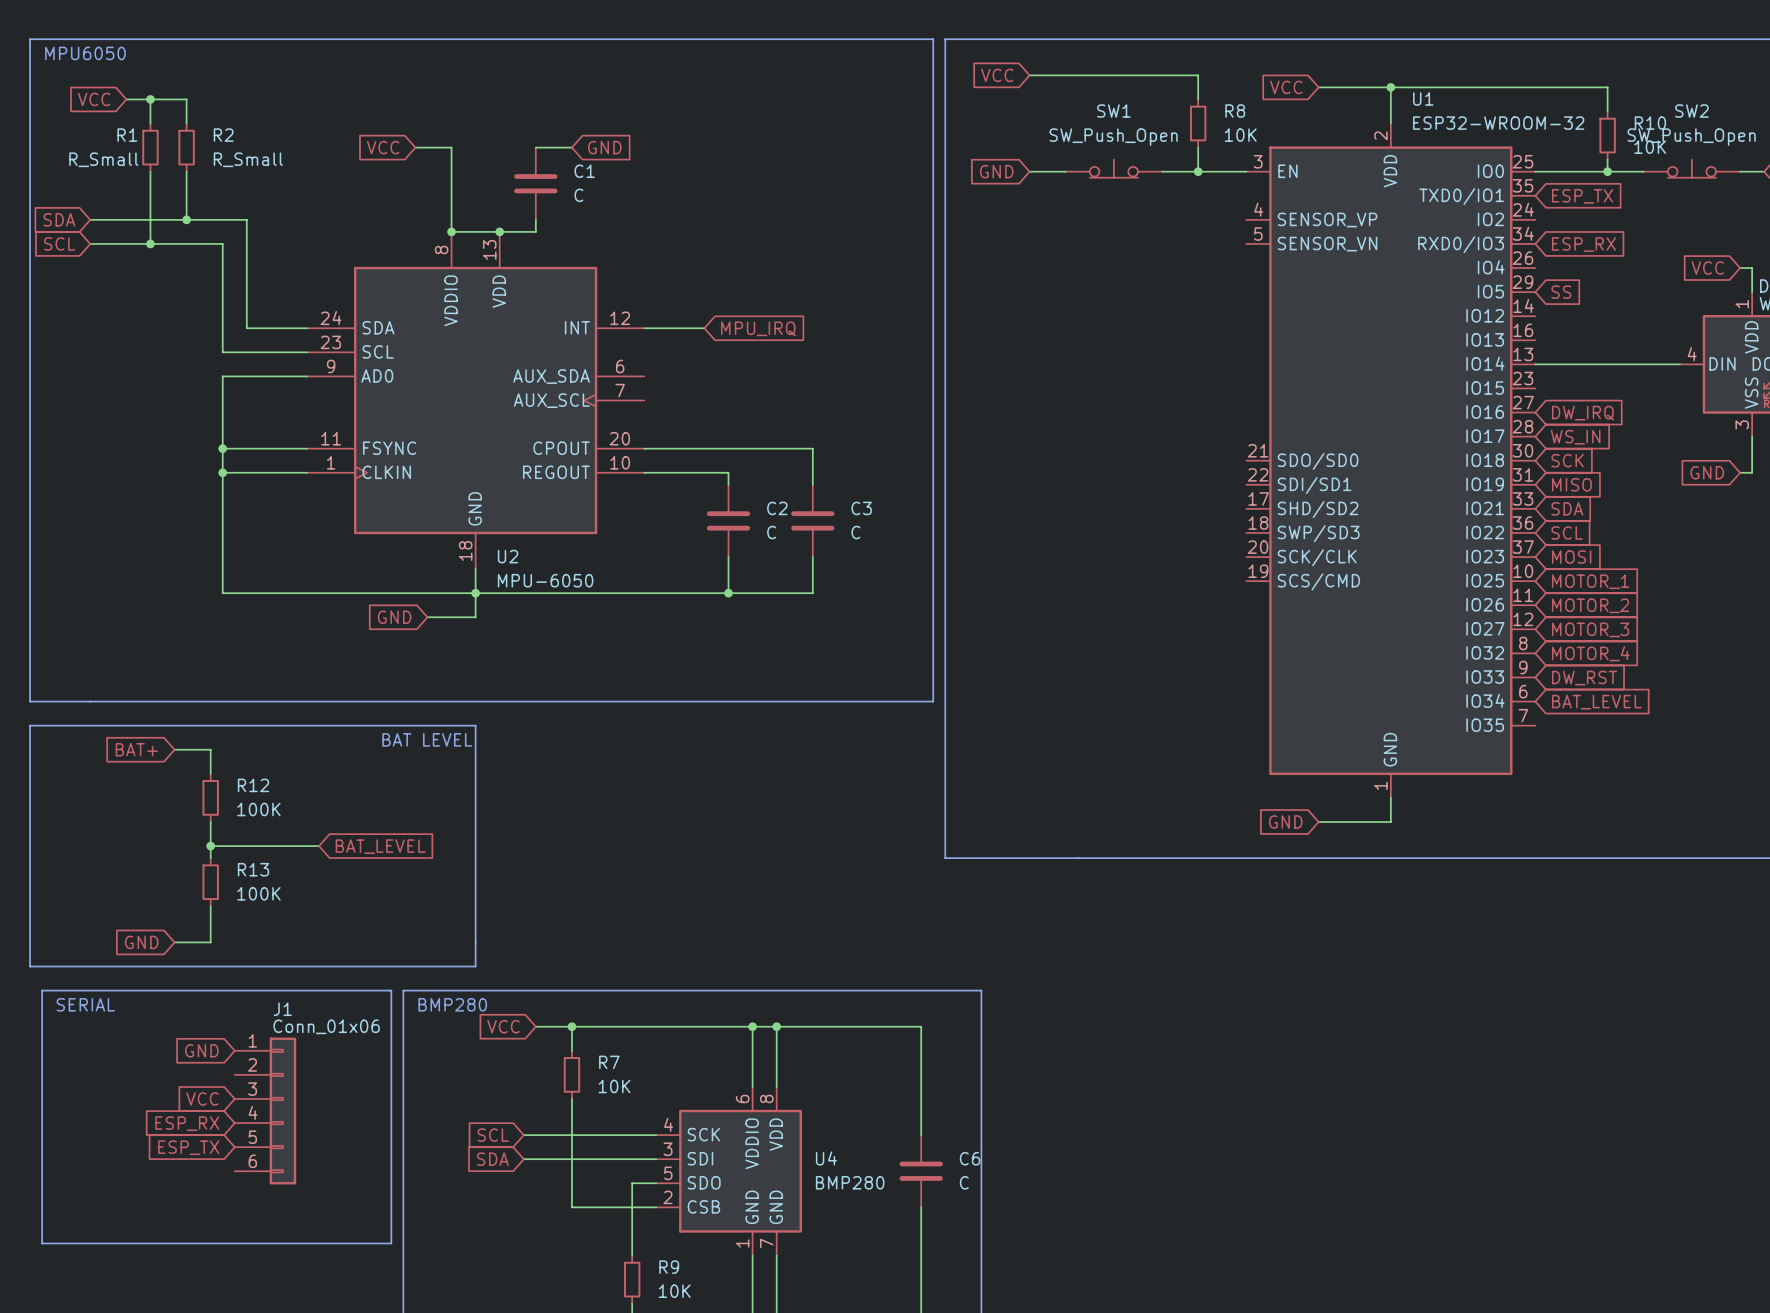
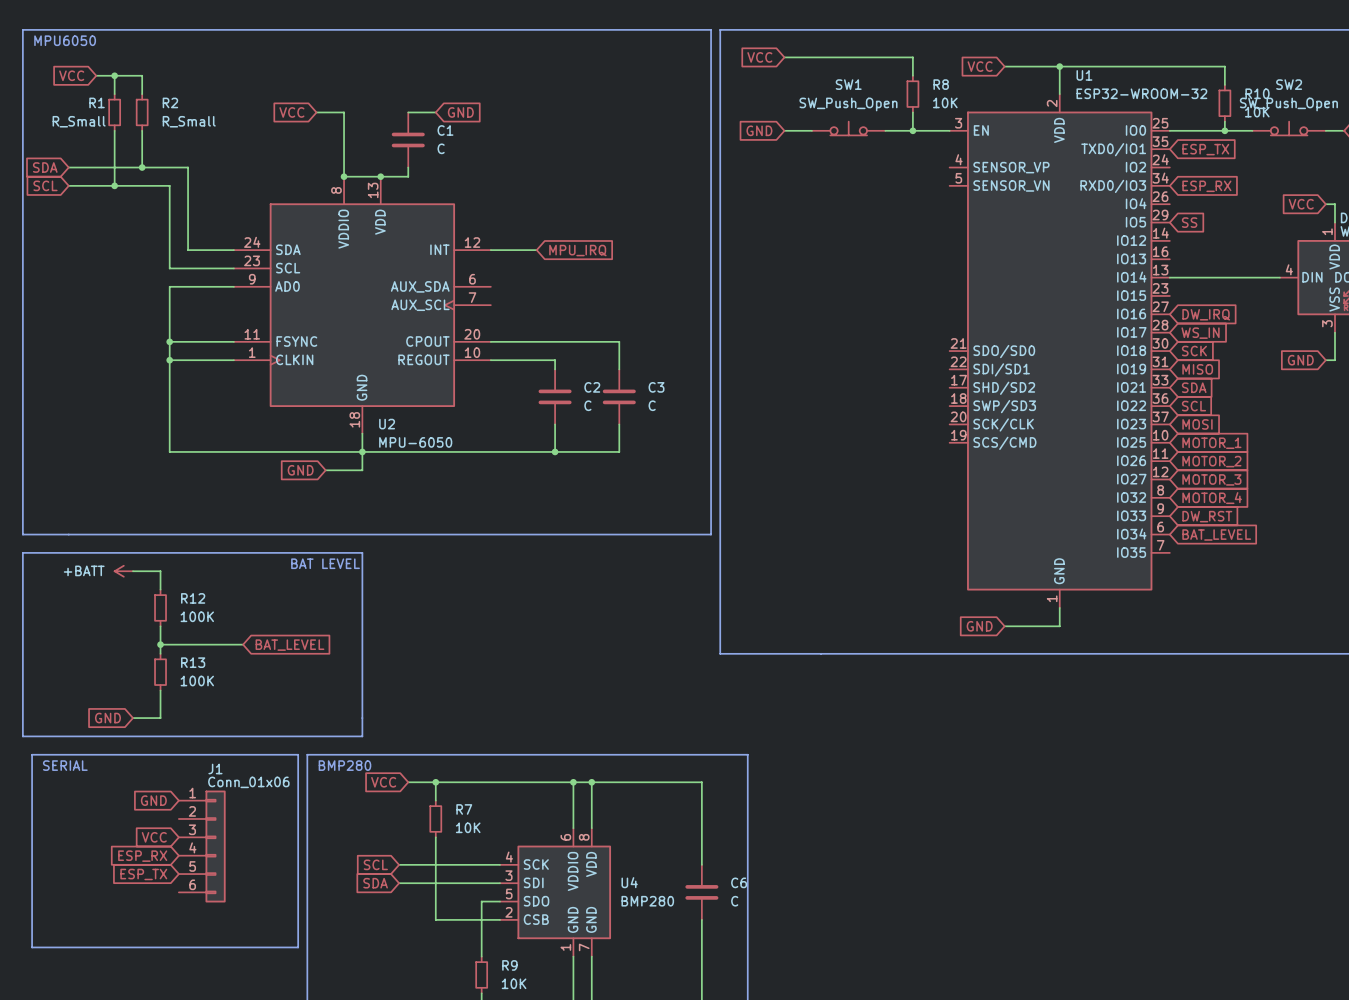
global label: BAT+ (136, 749) -> none
power symbol: none -> +BATT (123, 571)

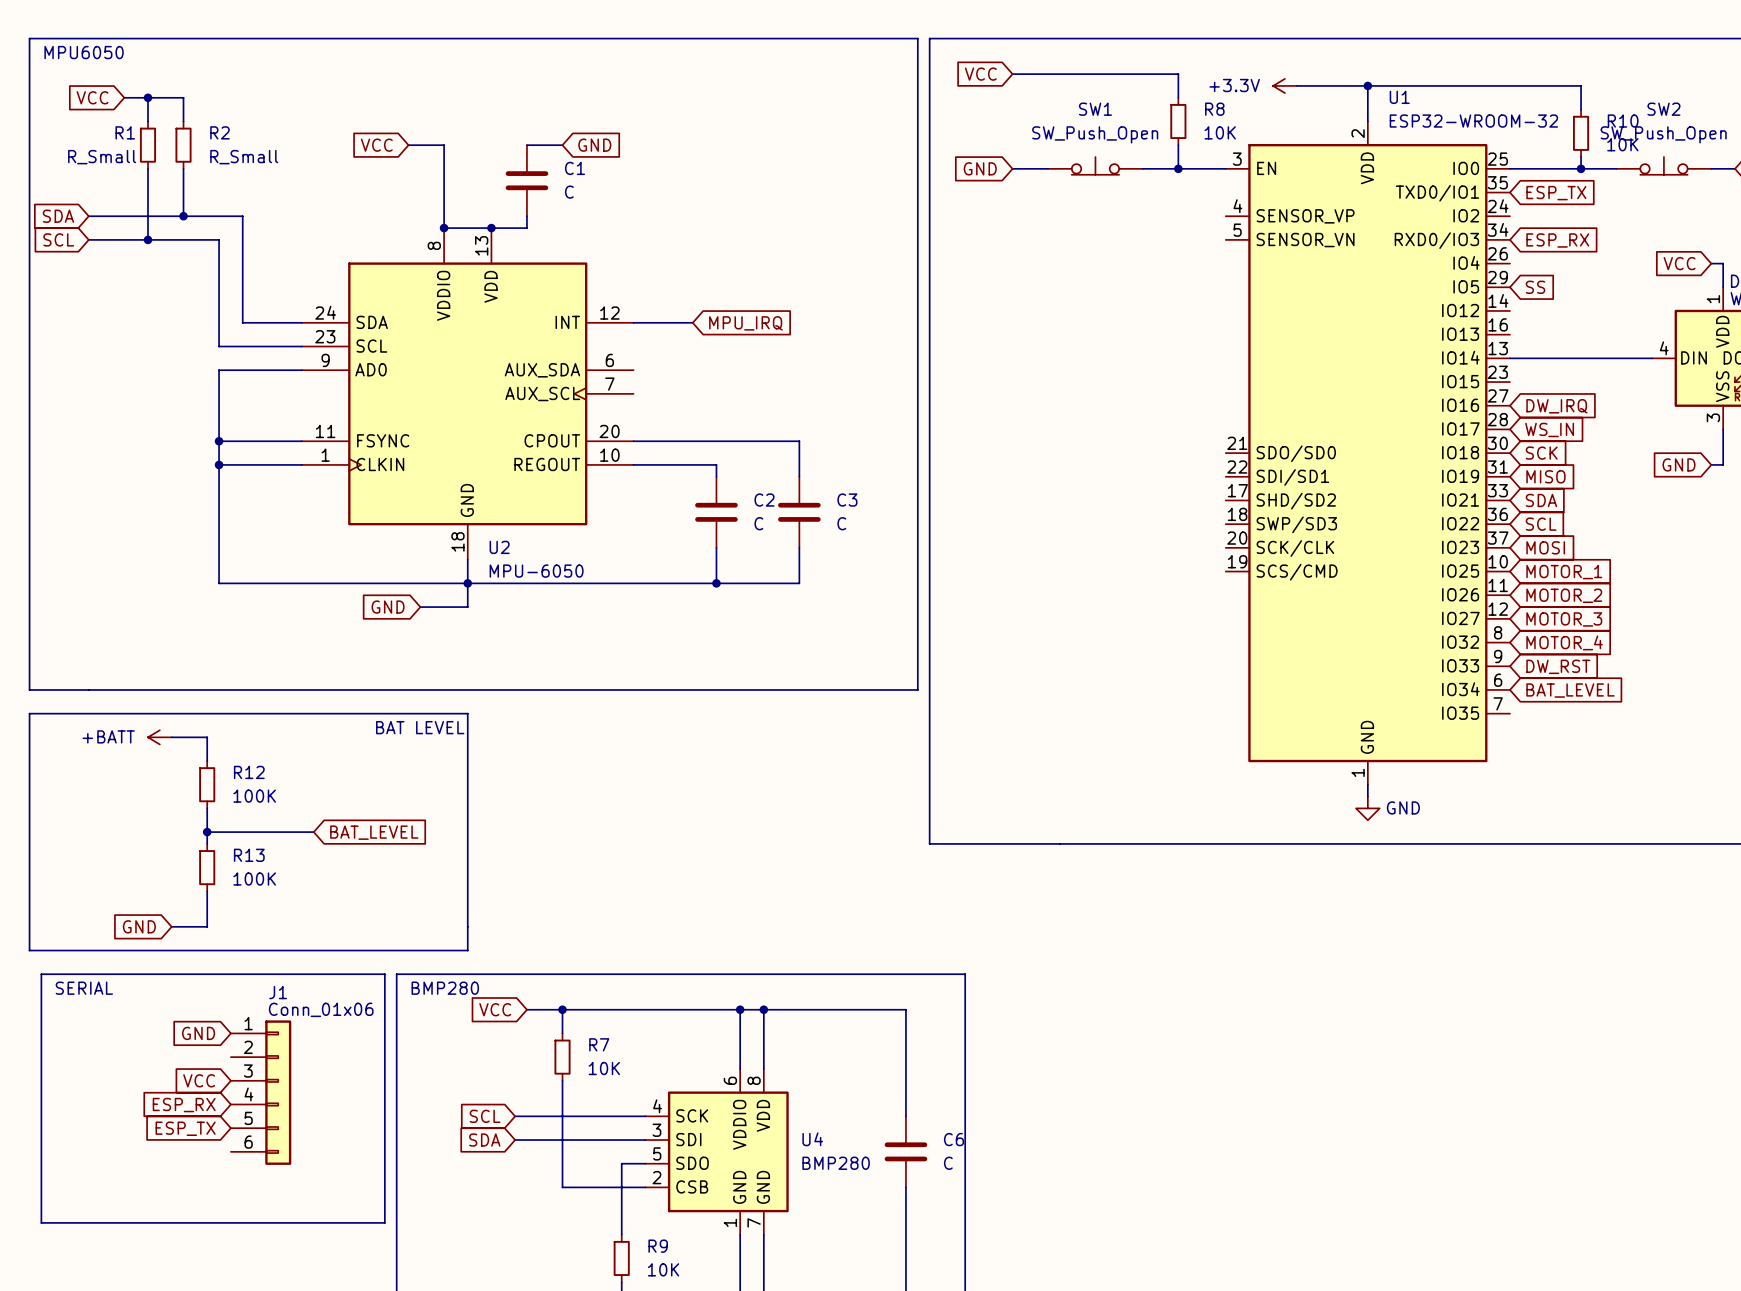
global label: VCC (980, 66) -> none
power symbol: none -> +3.3V (1284, 85)
wire: (1059, 617) (1059, 626) (1004, 626) -> none
global label: GND (979, 626) -> none
power symbol: none -> GND (1367, 808)

